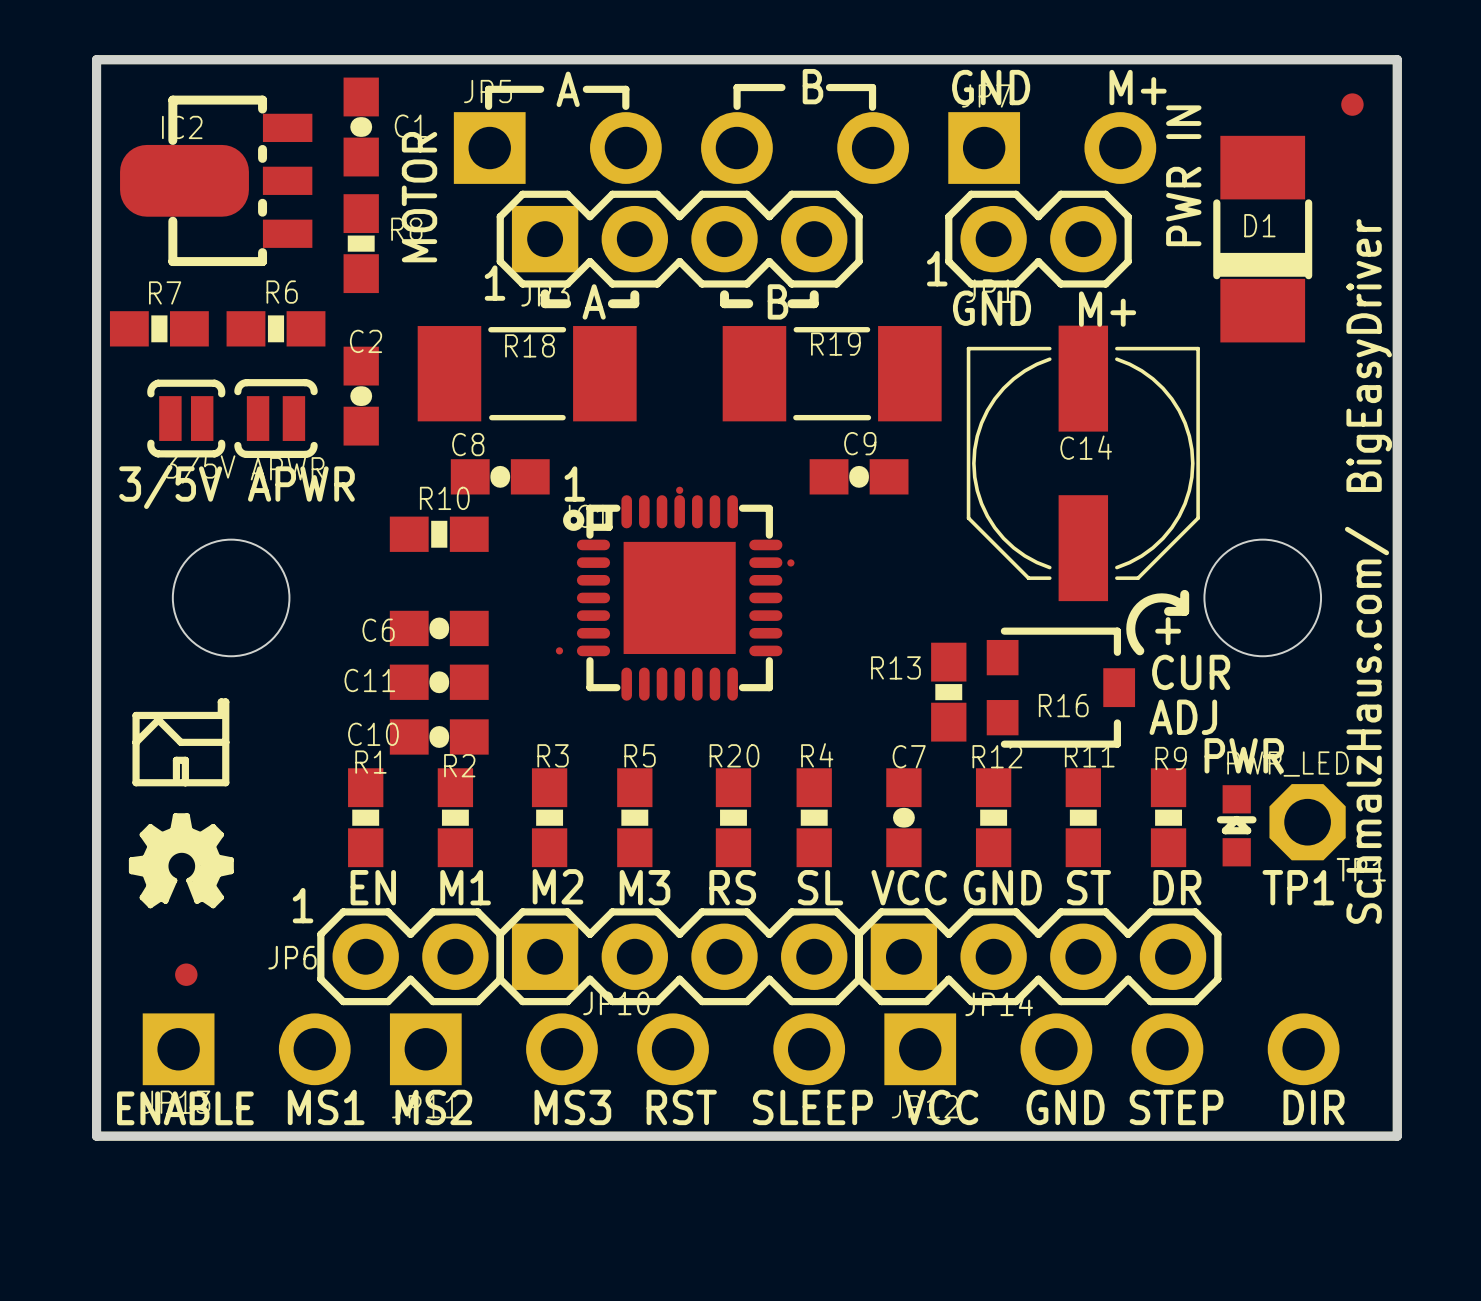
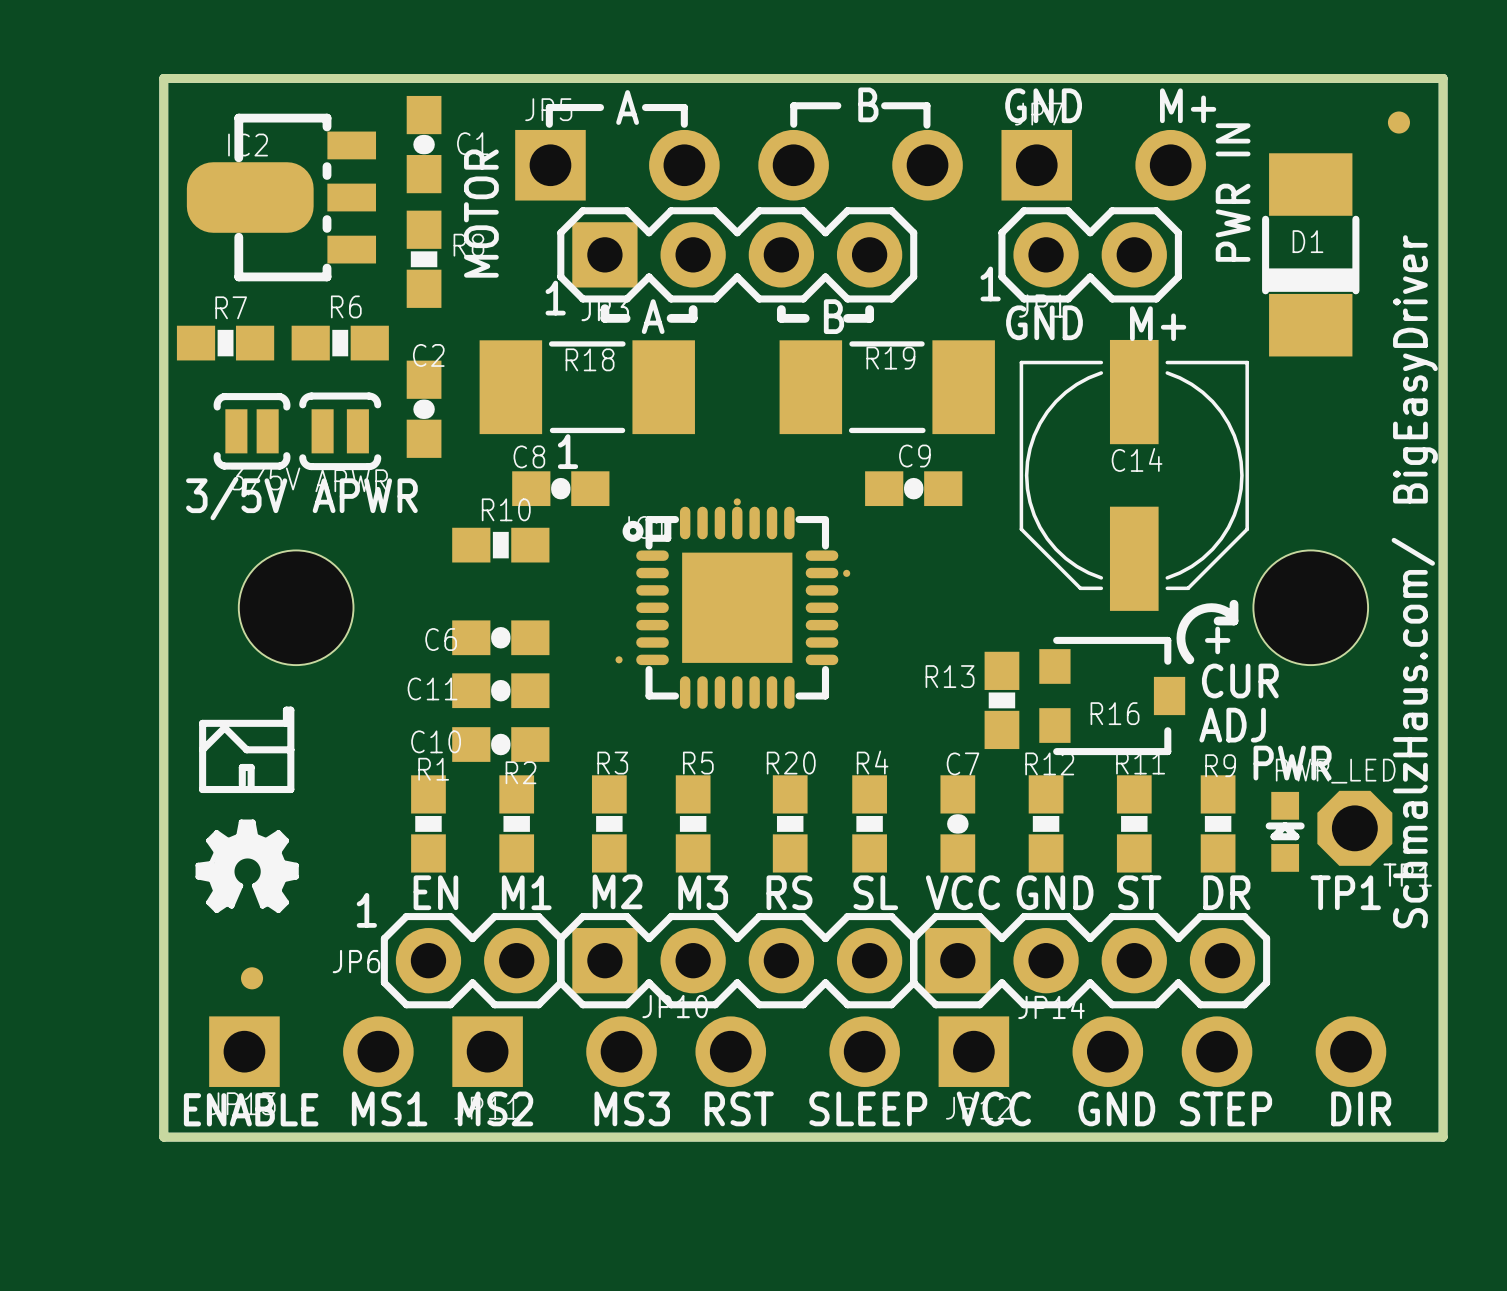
text position: 1 (574, 484) -> 1 (568, 451)

